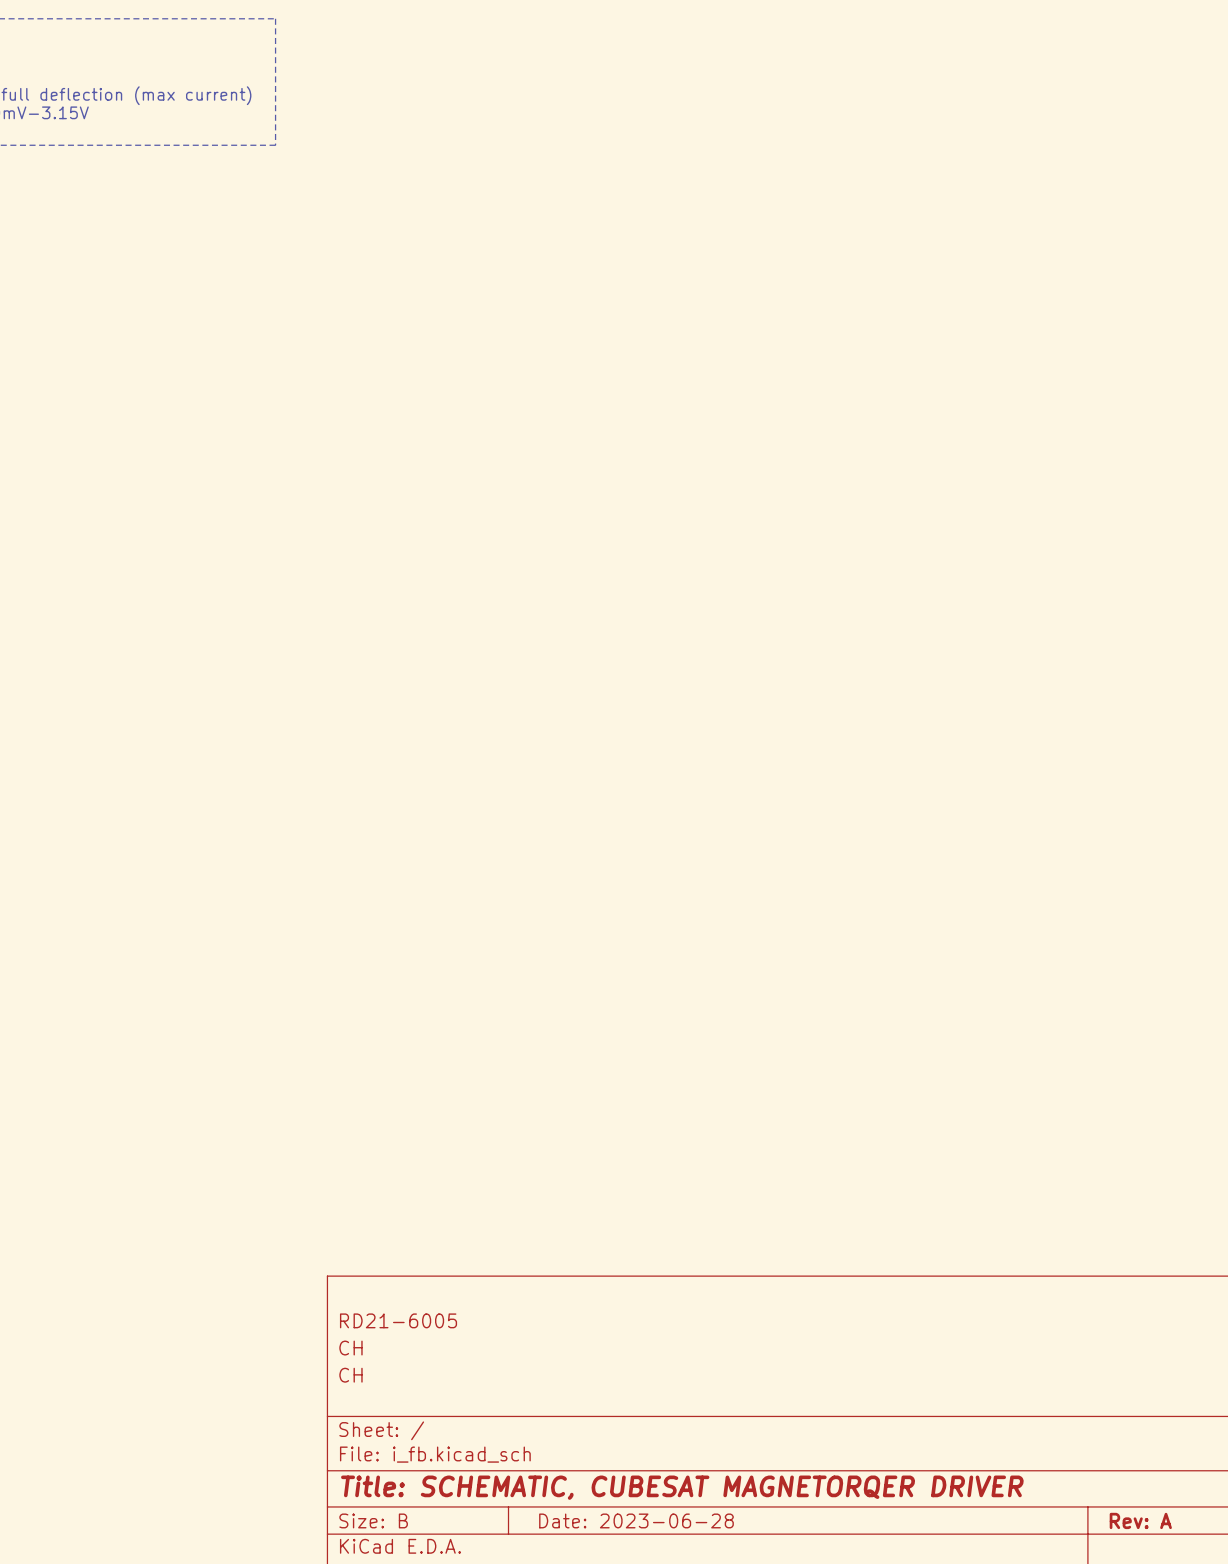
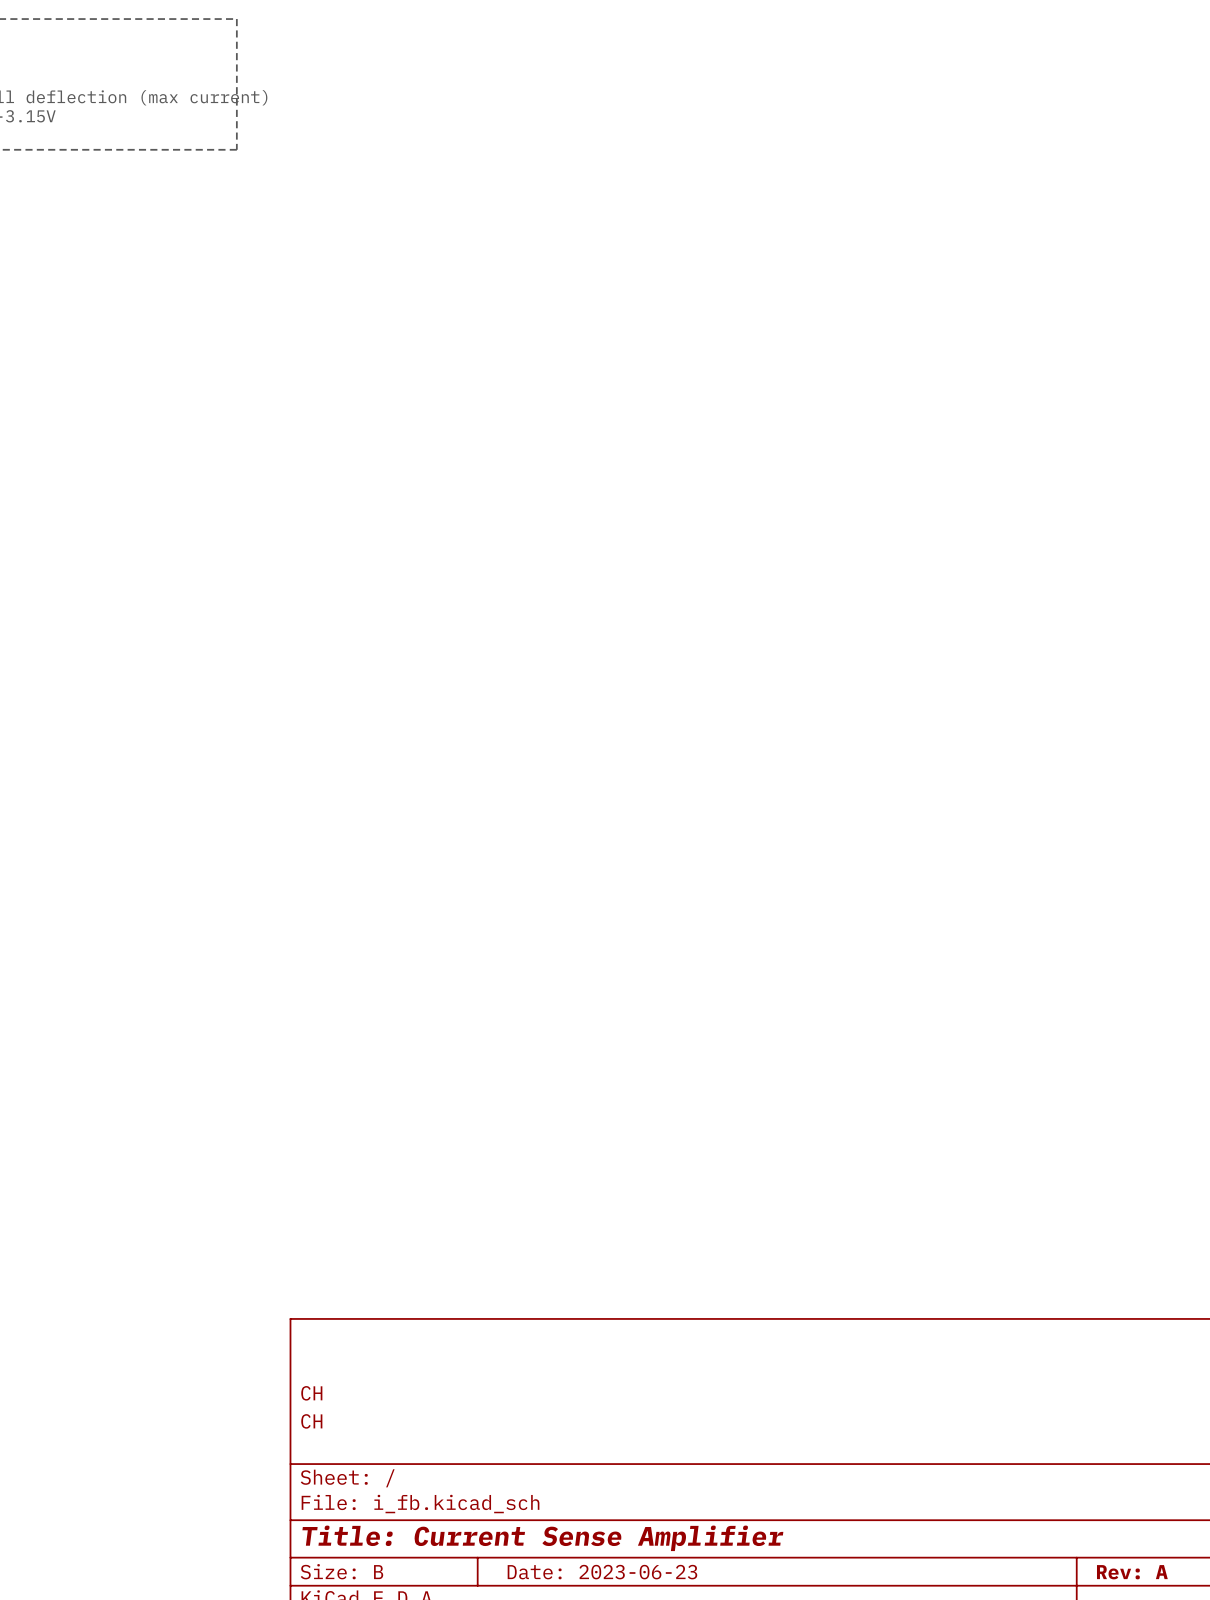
title block: RD21-6005 (398, 1320) -> none
title block: Title: SCHEMATIC, CUBESAT MAGNETORQER DRIVER (682, 1487) -> Title: Current Sense Amplifier (542, 1538)
title block: Date: 2023-06-28 (636, 1520) -> Date: 2023-06-23 (602, 1572)

